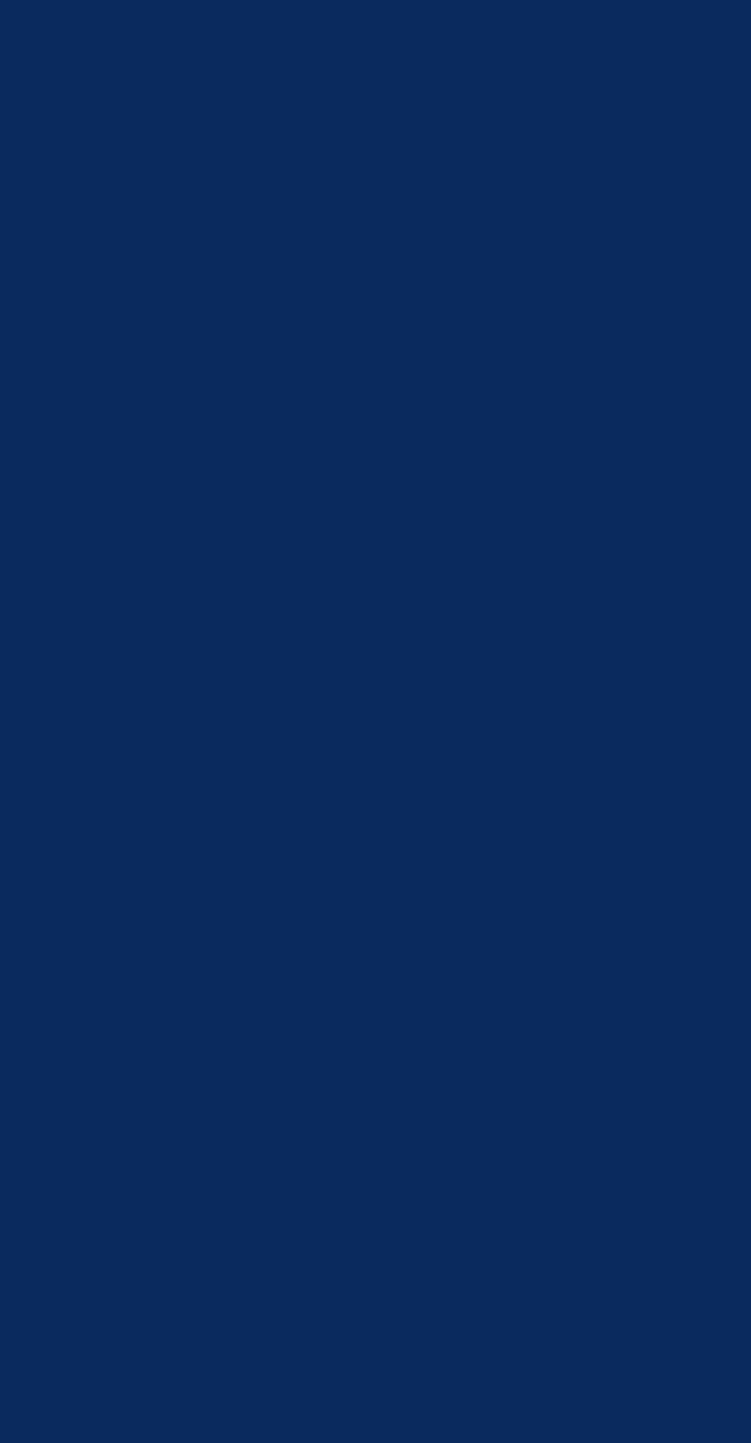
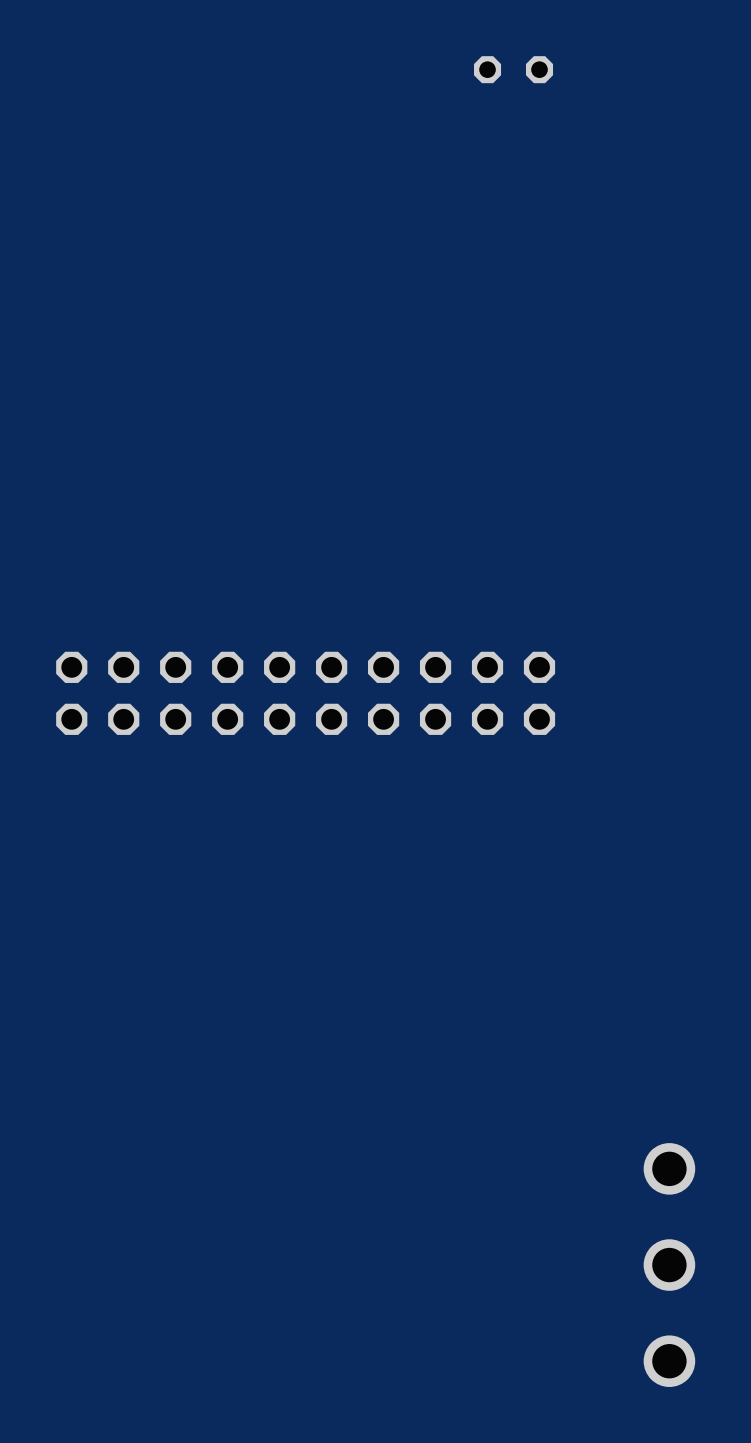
part: none -> (513, 69)
part: none -> (305, 693)
part: none -> (669, 1265)

